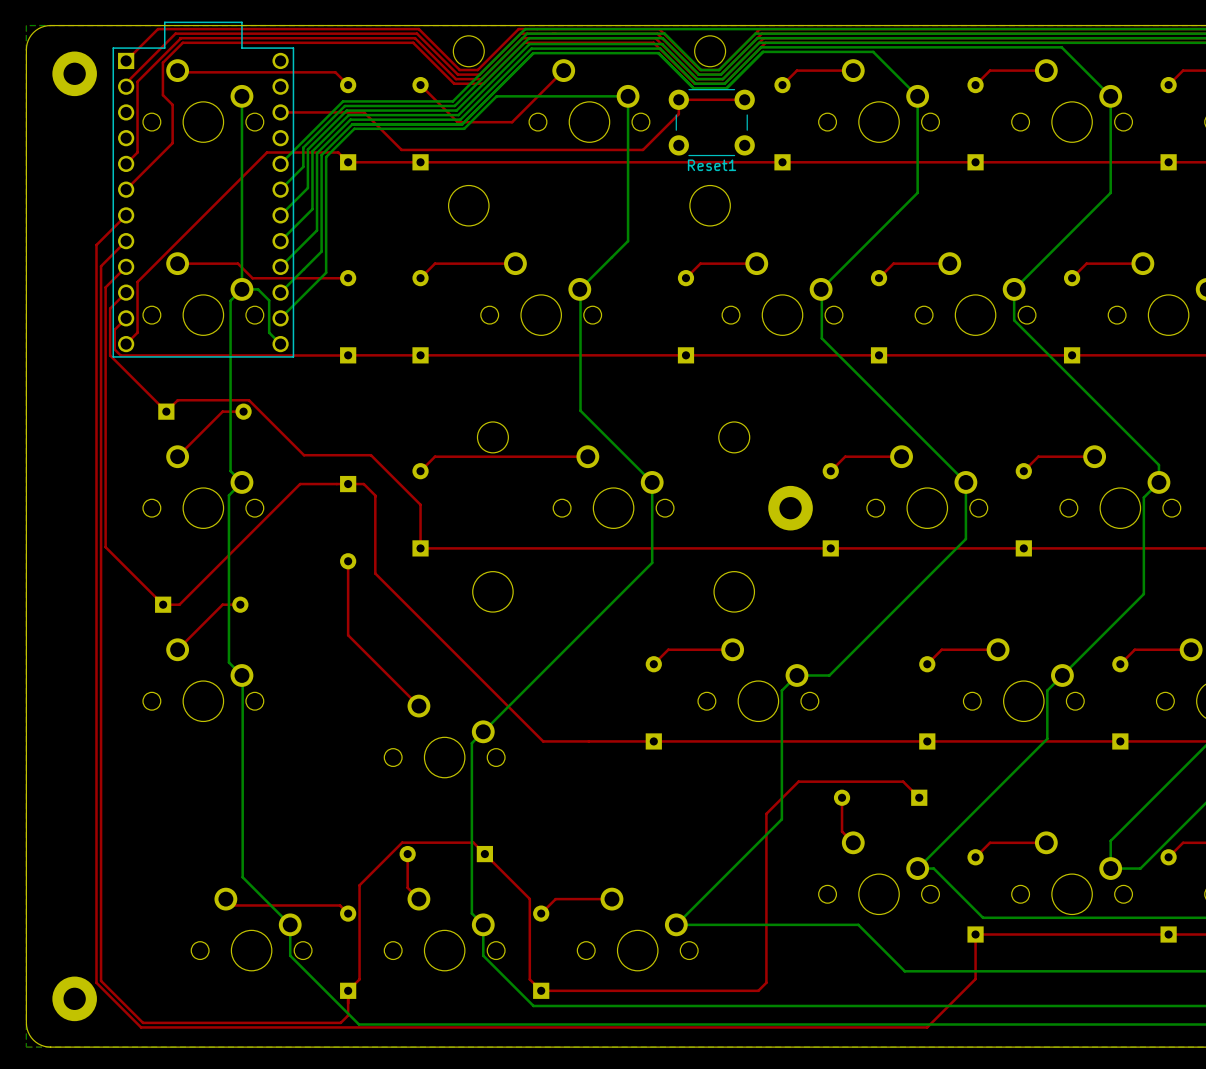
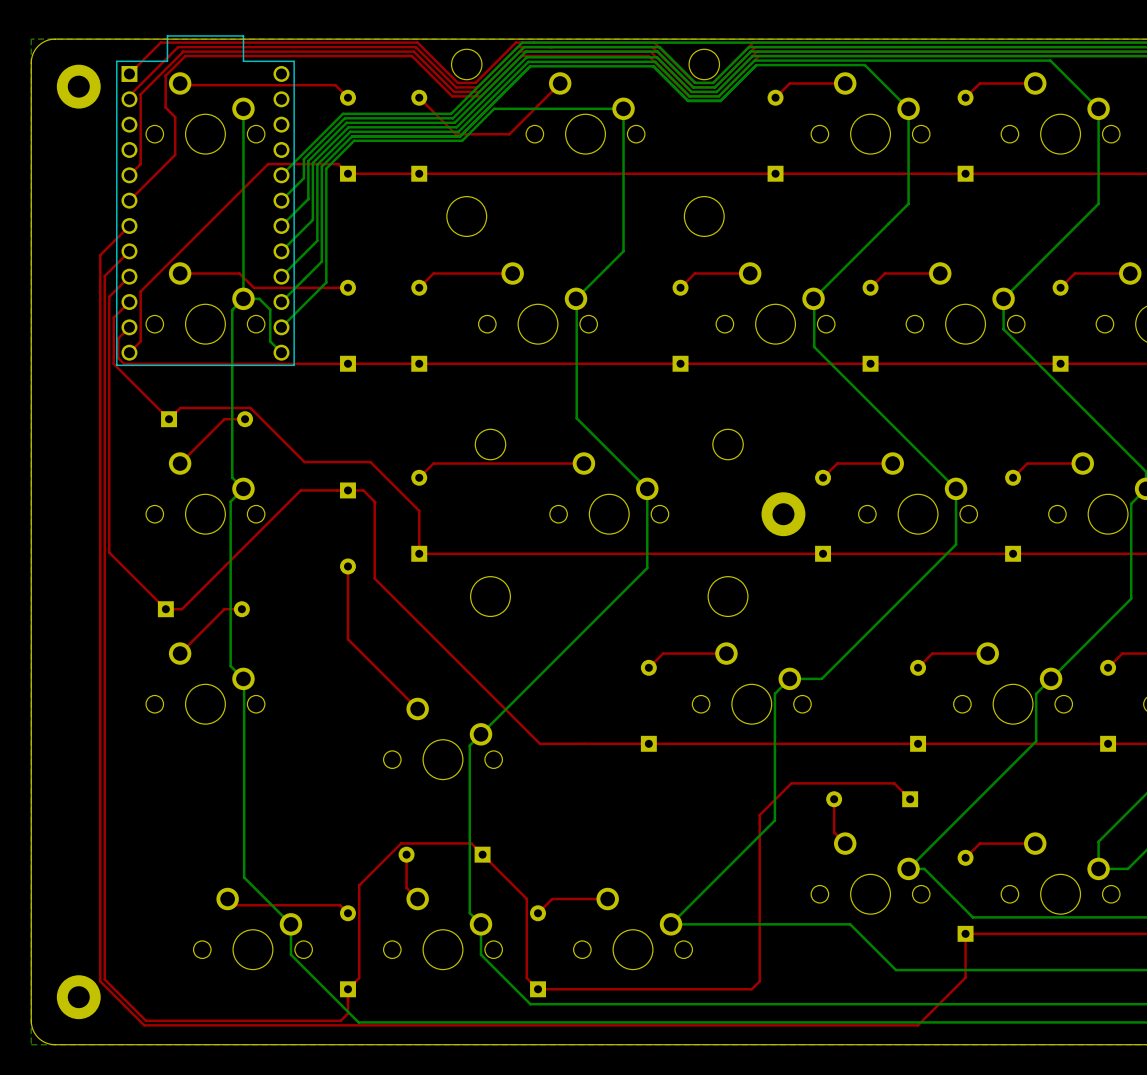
top track: (678, 99) (678, 114) (642, 149) (401, 149) (364, 112) (281, 112) -> none
top track: (744, 99) (679, 99) -> none
Reset1: (711, 122) -> none

